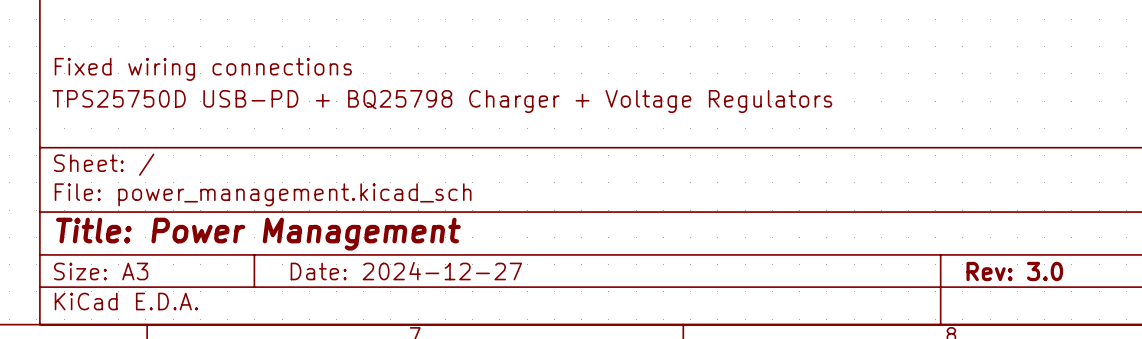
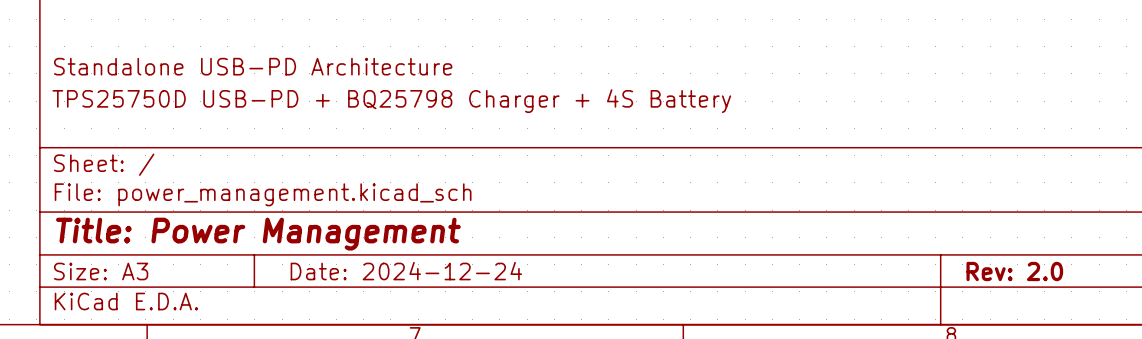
title block: Fixed wiring connections (203, 69) -> Standalone USB-PD Architecture (253, 66)
title block: TPS25750D USB-PD + BQ25798 Charger + Voltage Regulators (442, 101) -> TPS25750D USB-PD + BQ25798 Charger + 4S Battery (391, 101)
title block: Date: 2024-12-27 (406, 271) -> Date: 2024-12-24 (406, 271)
title block: Rev: 3.0 (1014, 271) -> Rev: 2.0 (1014, 271)

